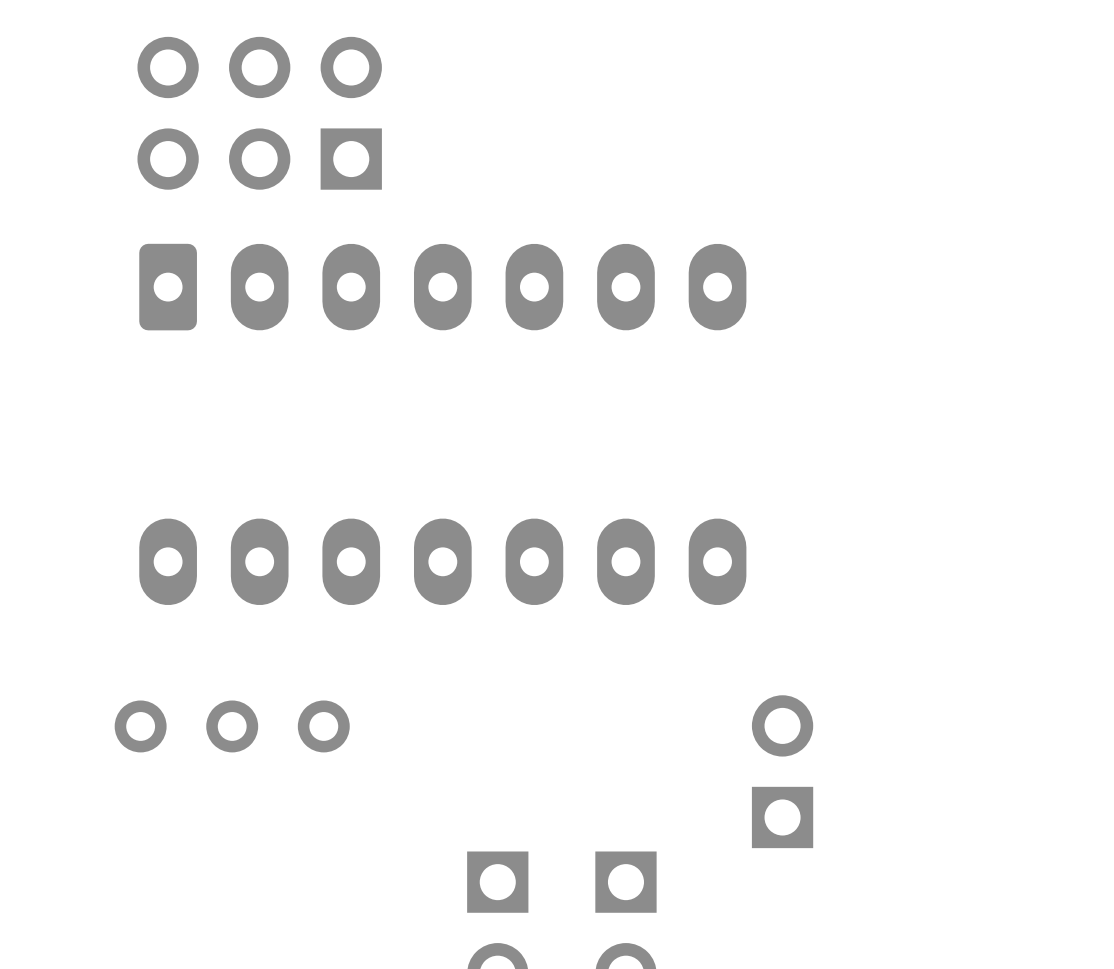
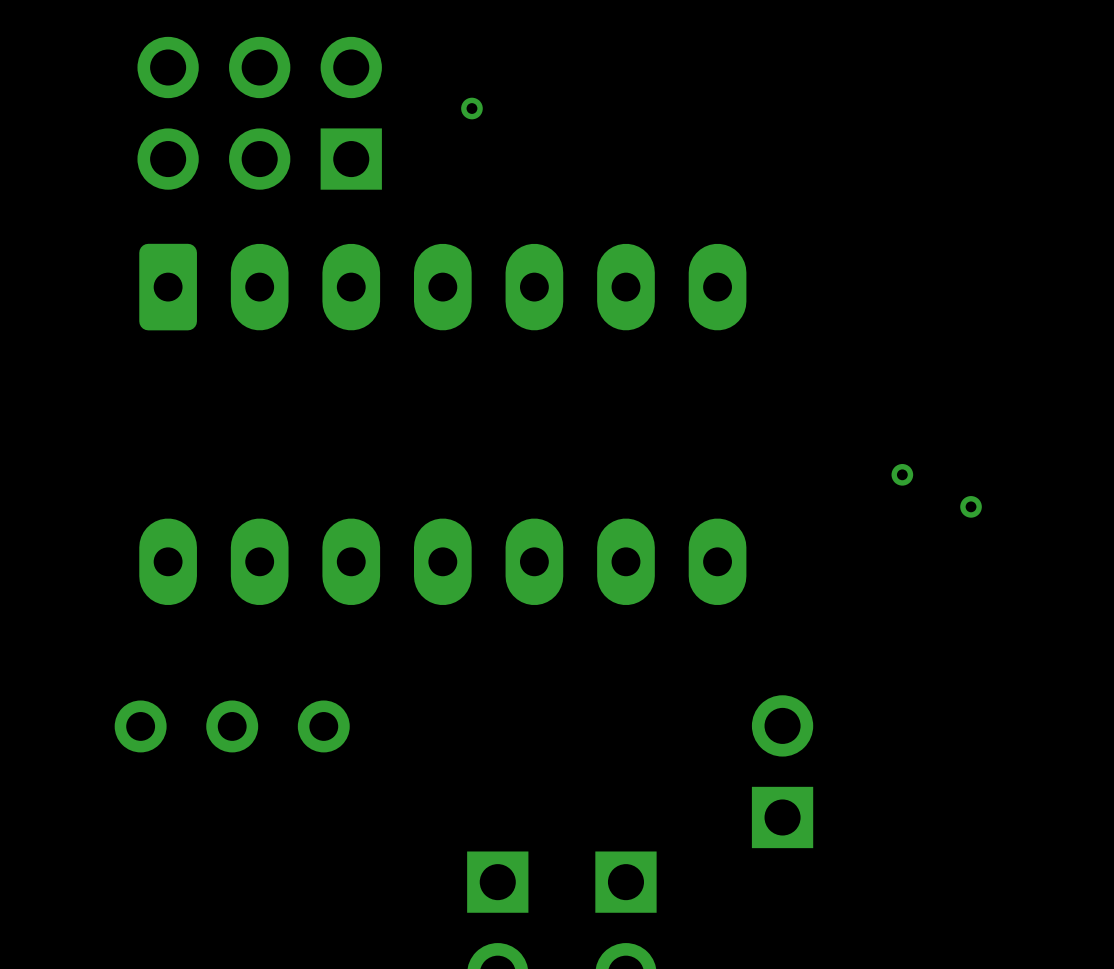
via: none -> (471, 108)
via: none -> (902, 474)
via: none -> (971, 506)

